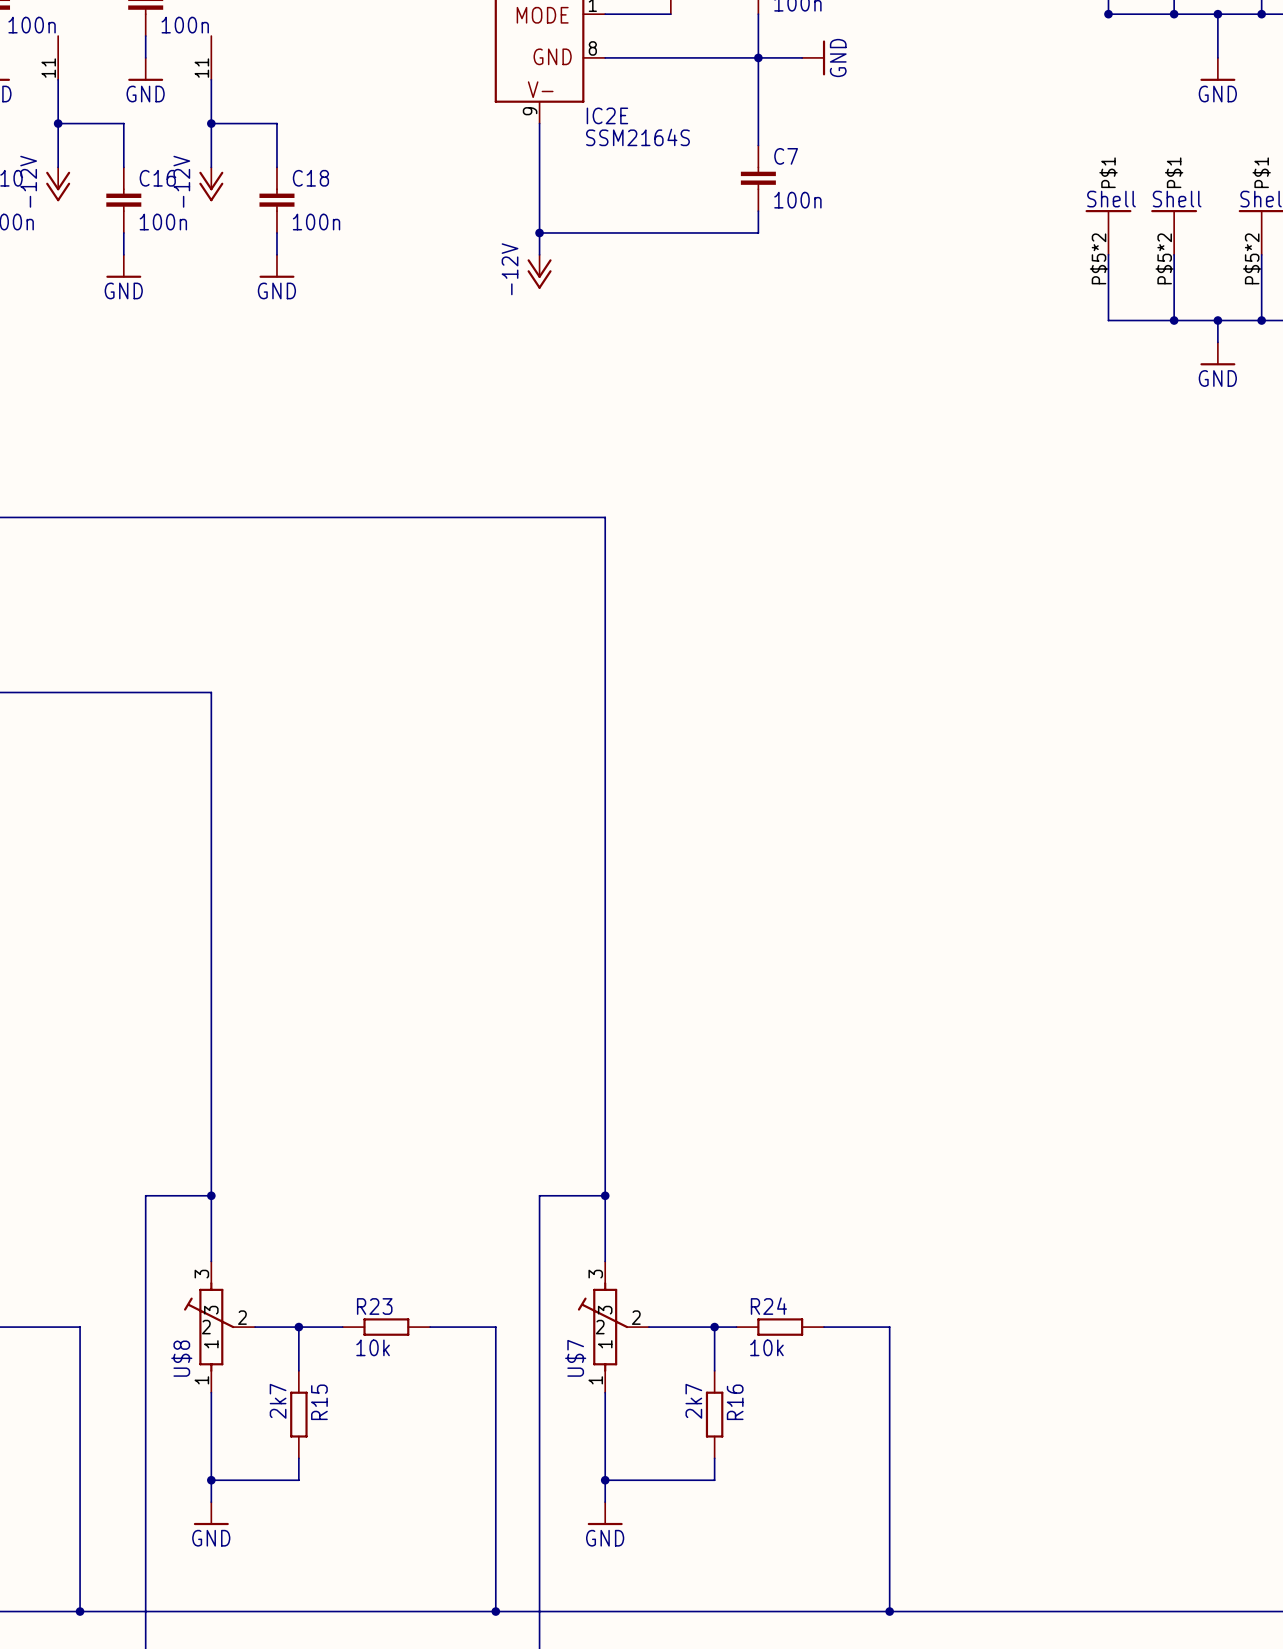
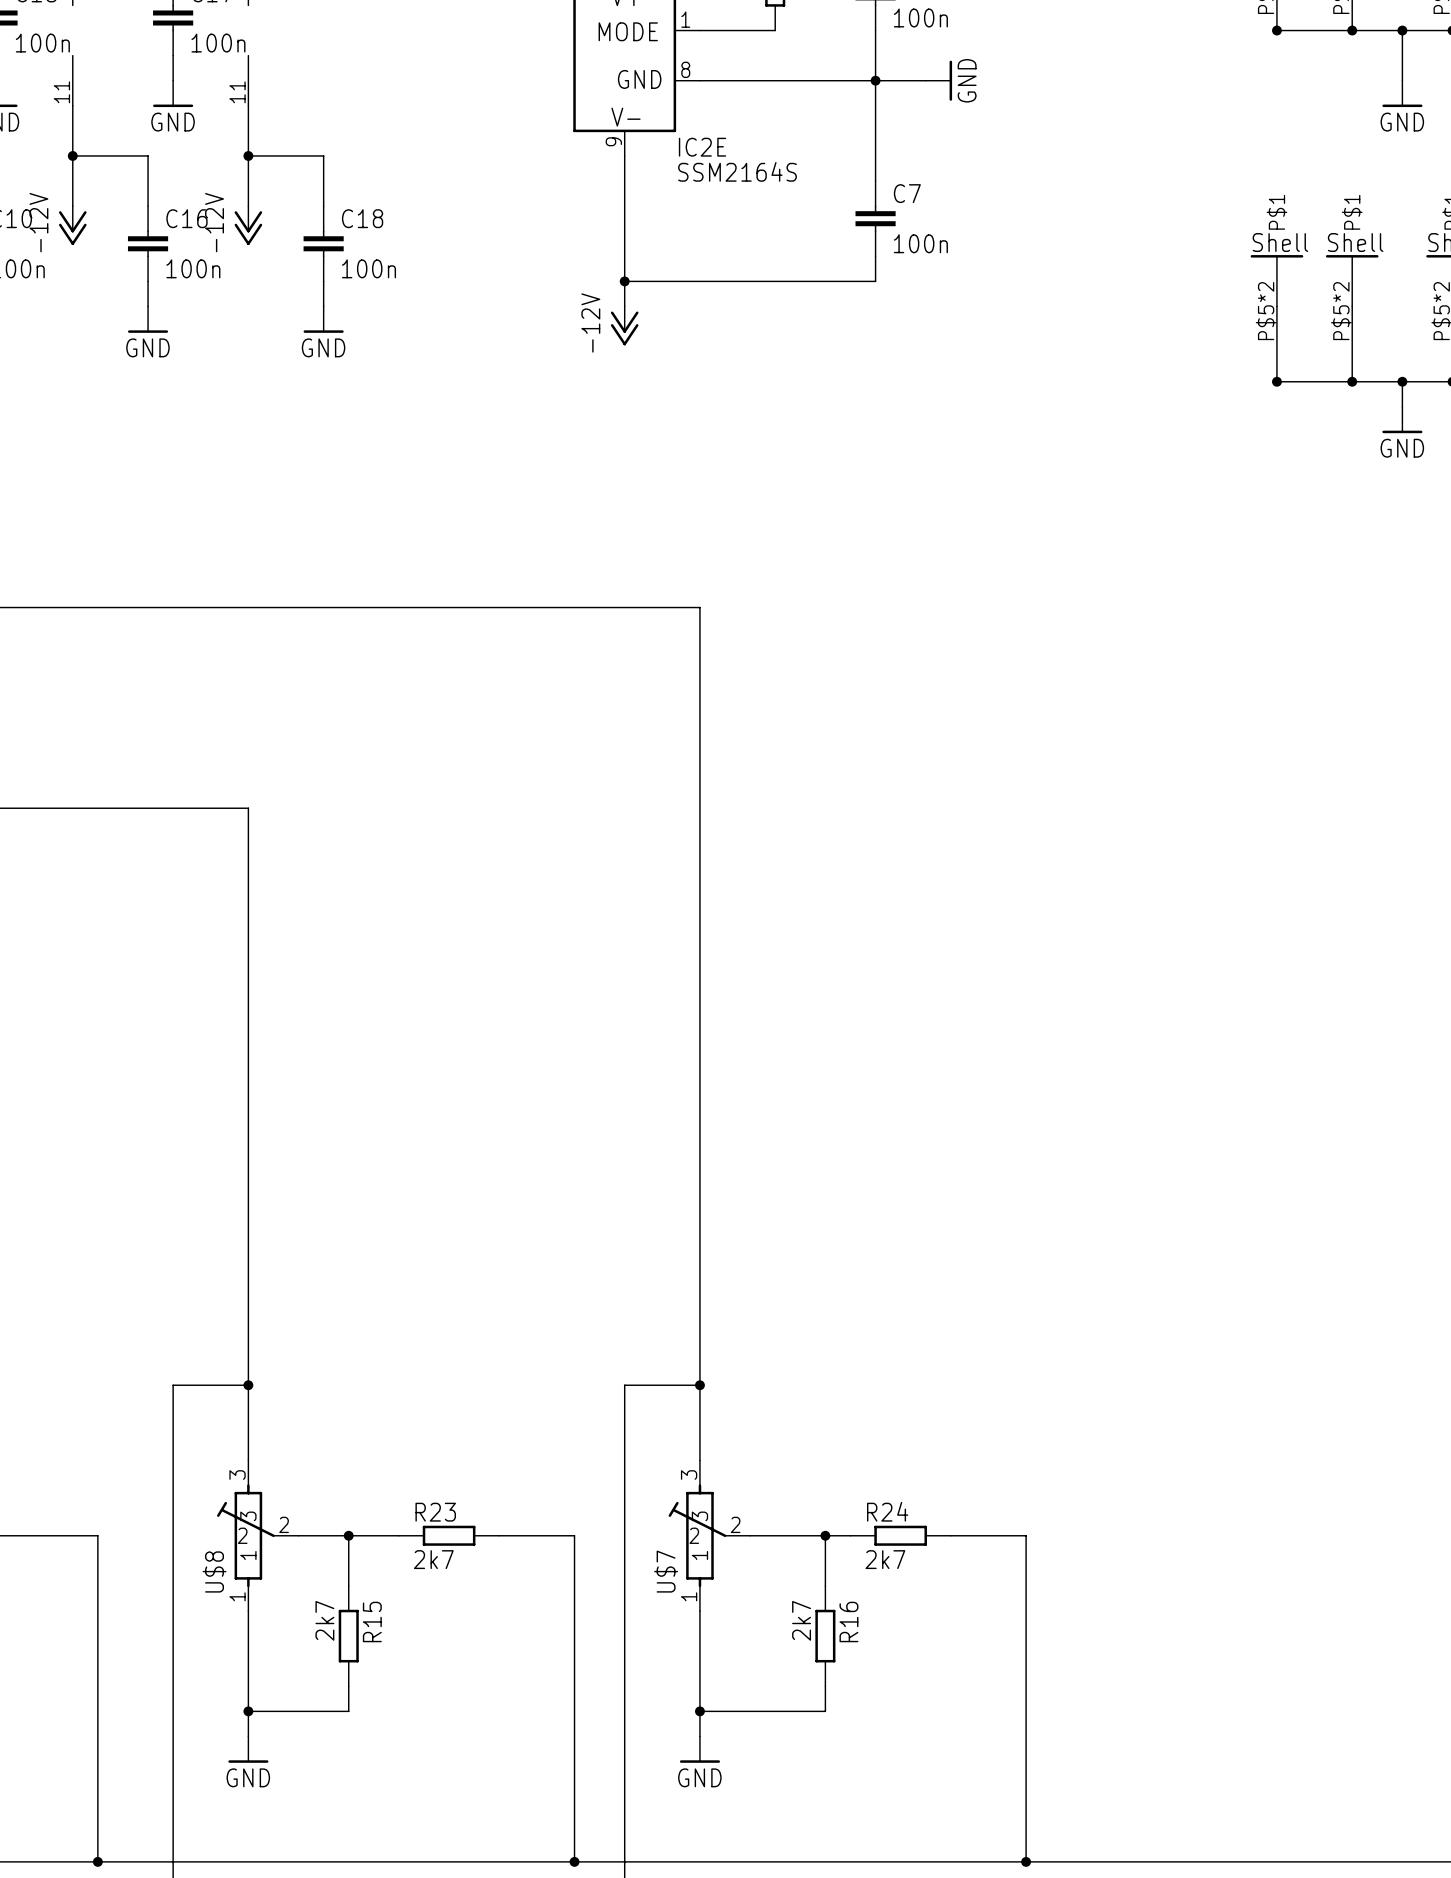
junction: none -> (1276, 381)
R23 value: 10k (373, 1347) -> 2k7 (433, 1559)
R24 value: 10k (766, 1347) -> 2k7 (885, 1559)

